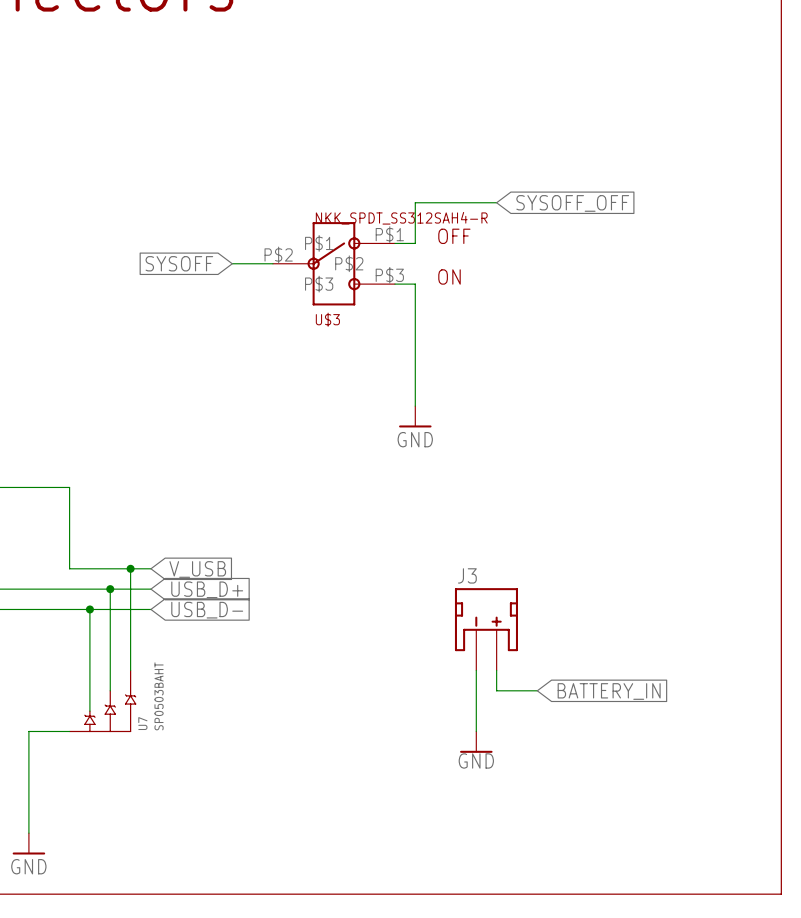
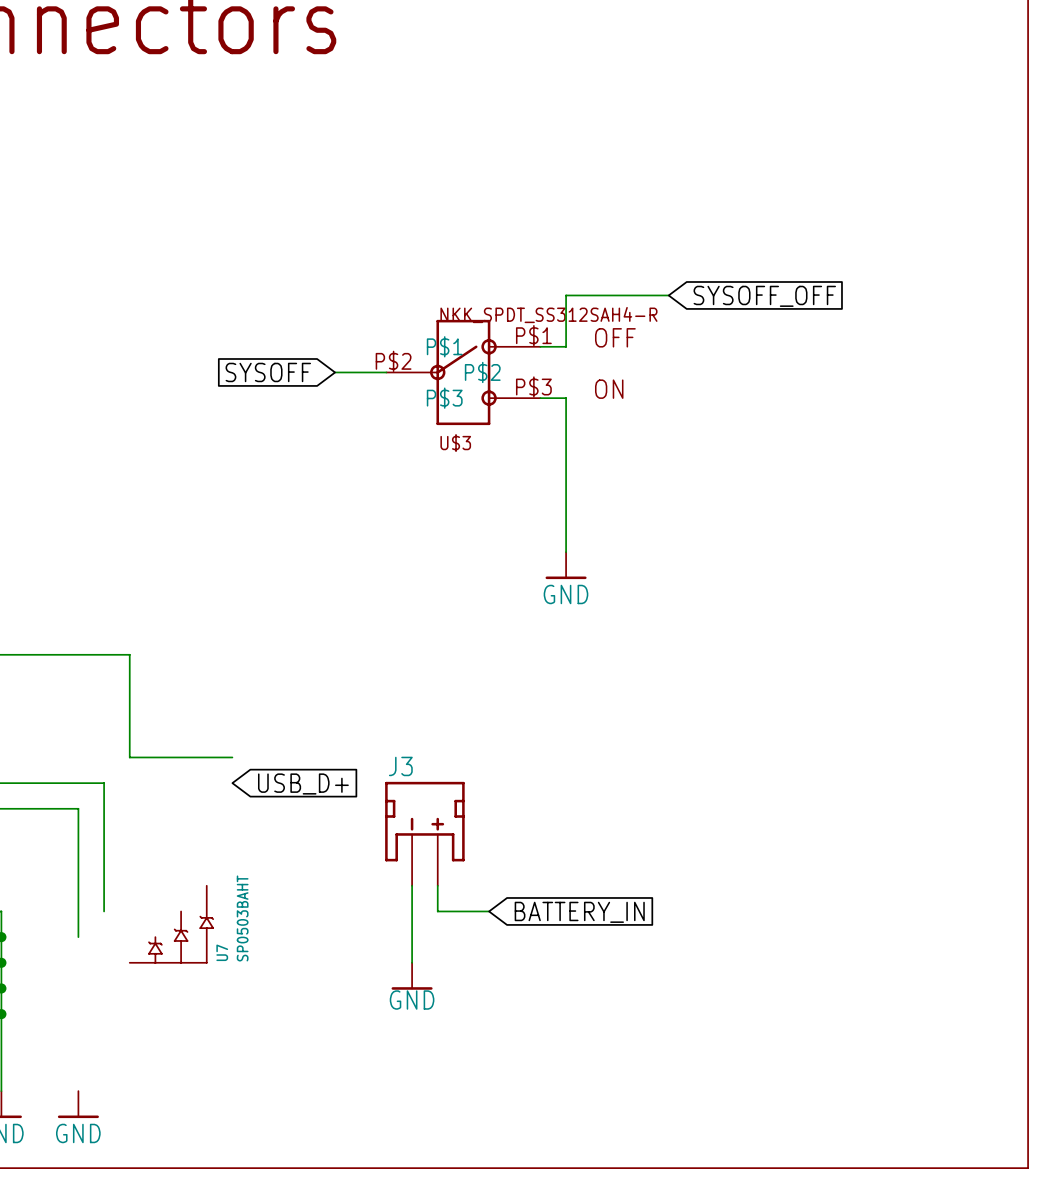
wire: (130, 568) (130, 670) -> none
junction: (130, 568) -> none
global label: V_USB (197, 569) -> none
wire: (49, 589) (150, 589) -> (104, 783) (104, 911)
wire: (110, 589) (110, 690) -> none
junction: (110, 589) -> none
wire: (28, 609) (150, 609) -> (78, 808) (78, 937)
wire: (89, 609) (89, 711) -> none
junction: (89, 609) -> none
global label: USB_D- (207, 610) -> none
J3 position: (486, 629) -> (424, 833)
wire: (476, 670) (476, 731) -> (412, 885) (412, 962)
wire: (496, 670) (496, 690) (537, 690) -> (437, 885) (437, 911) (489, 911)
global label position: BATTERY_IN (609, 691) -> BATTERY_IN (579, 912)
wire: (69, 731) (28, 731) (28, 833) -> none
power symbol position: GND (476, 742) -> GND (412, 976)

